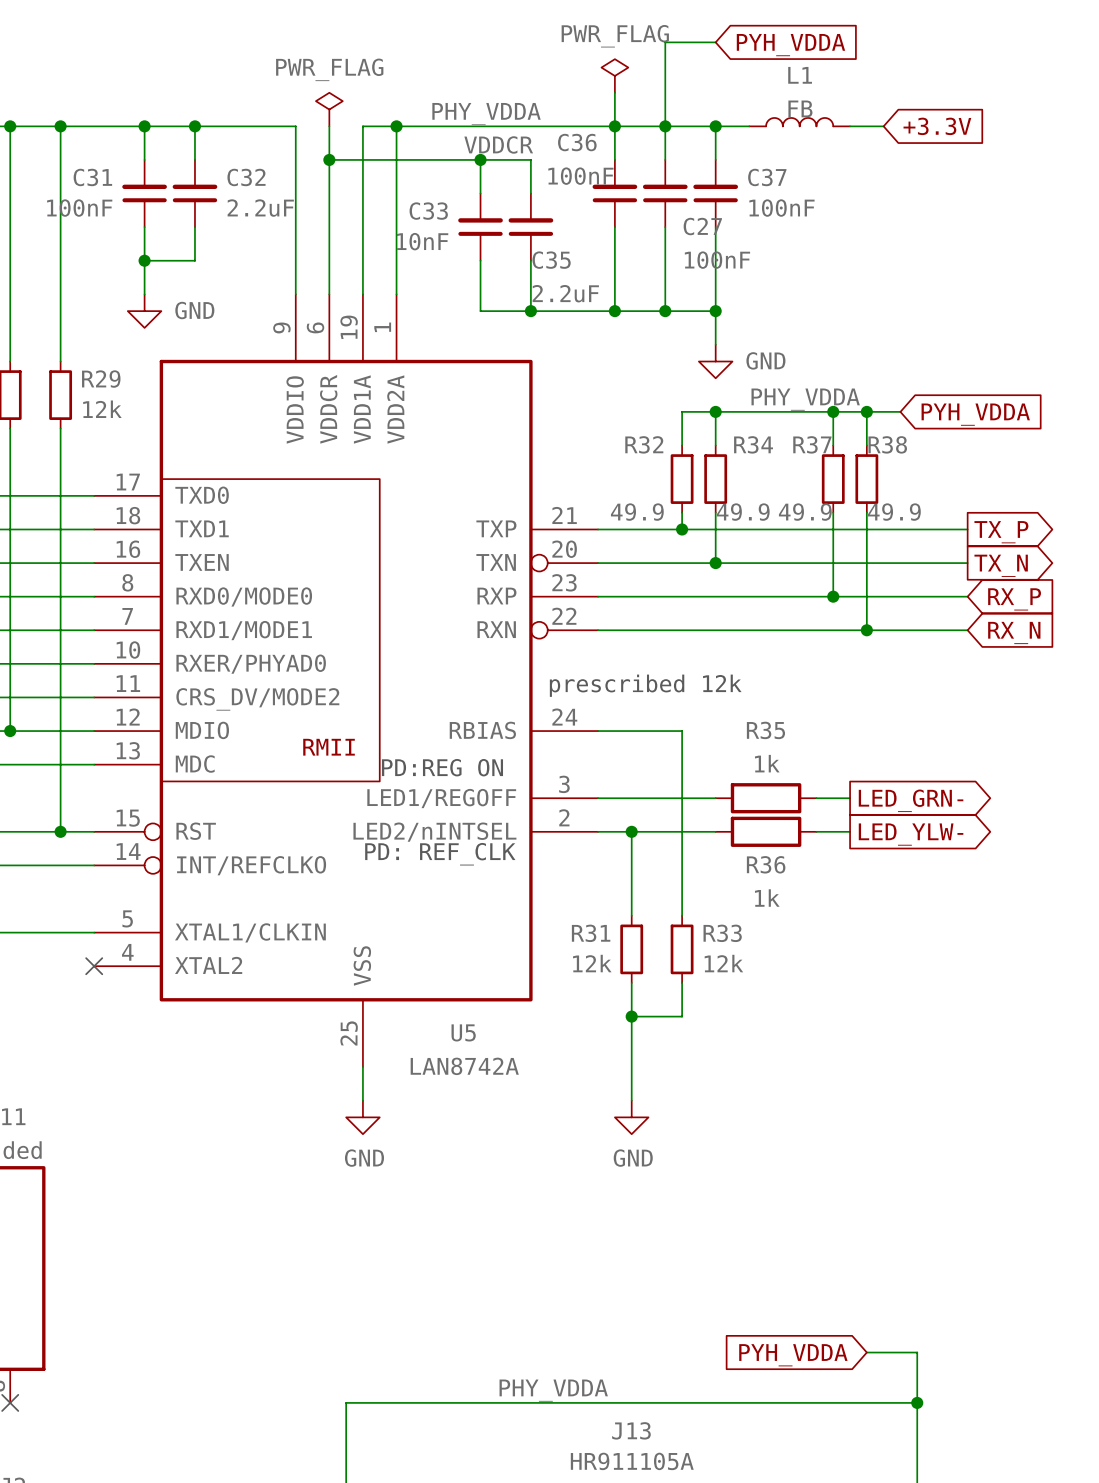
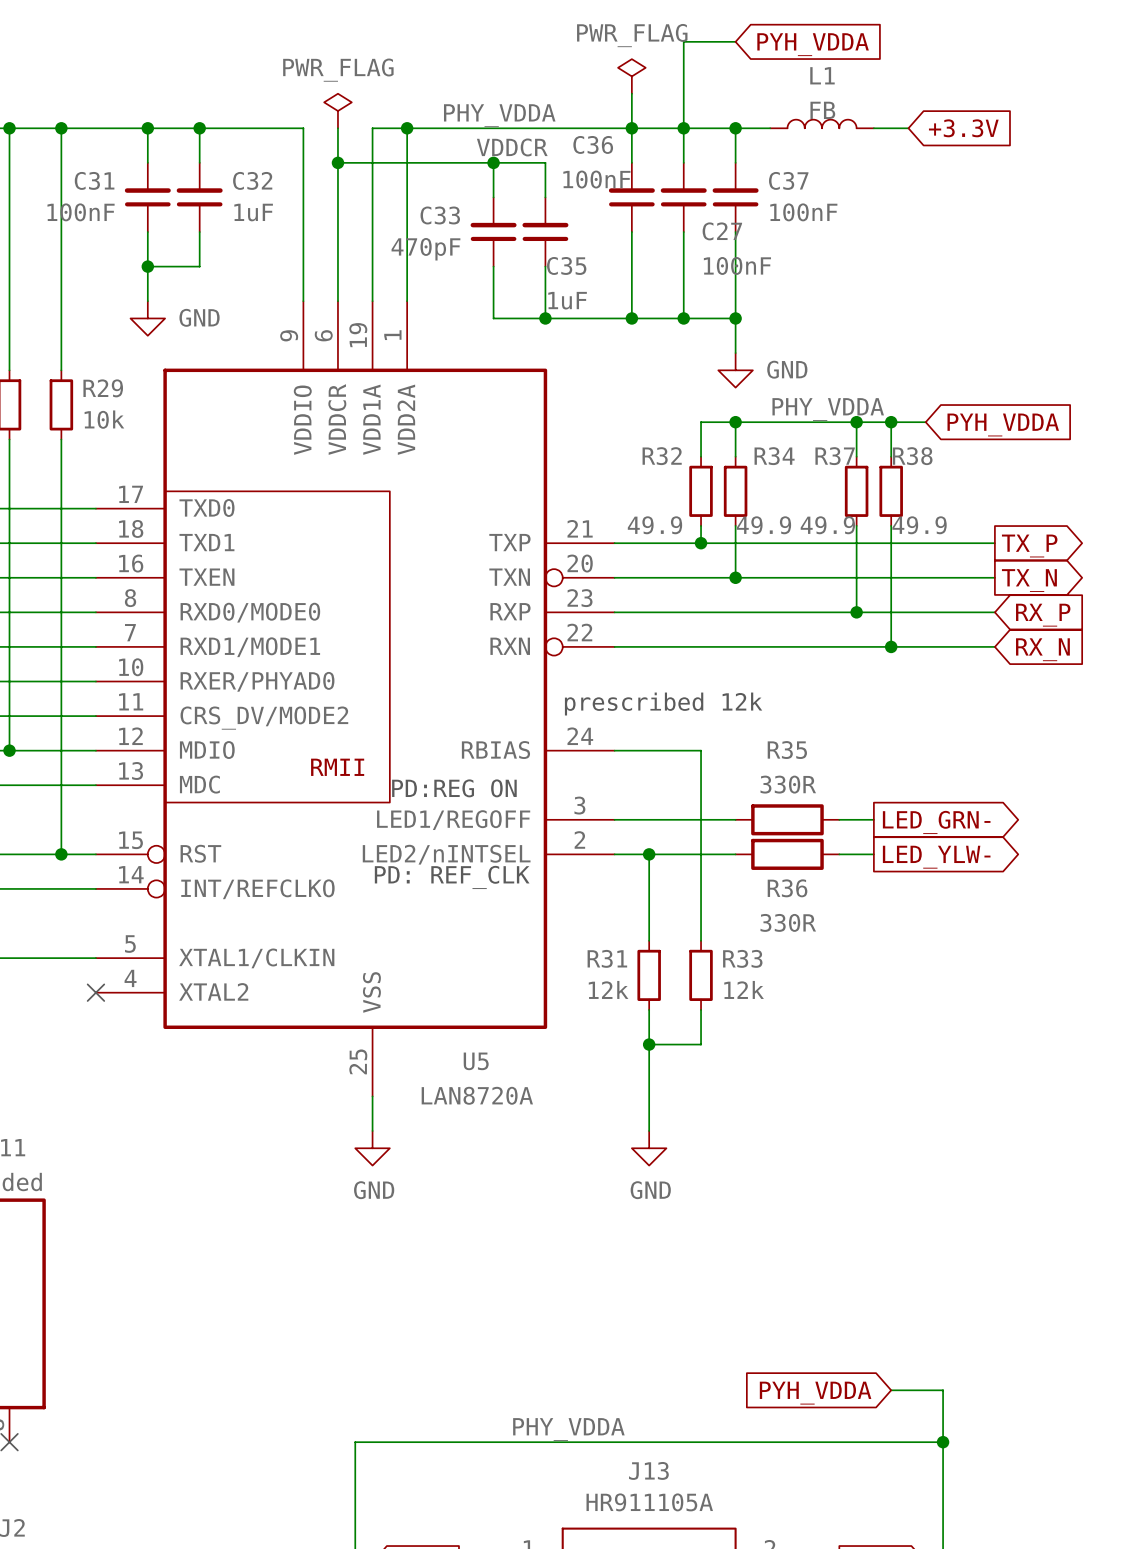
C32 value: 2.2uF (260, 208) -> 1uF (253, 212)
C33 value: 10nF (422, 241) -> 470pF (425, 249)
C35 value: 2.2uF (565, 293) -> 1uF (567, 300)
R29 value: 12k (102, 409) -> 10k (104, 419)
R35 value: 1k (767, 763) -> 330R (788, 784)
R36 value: 1k (767, 898) -> 330R (788, 922)
U5 value: LAN8742A (464, 1066) -> LAN8720A (477, 1095)

